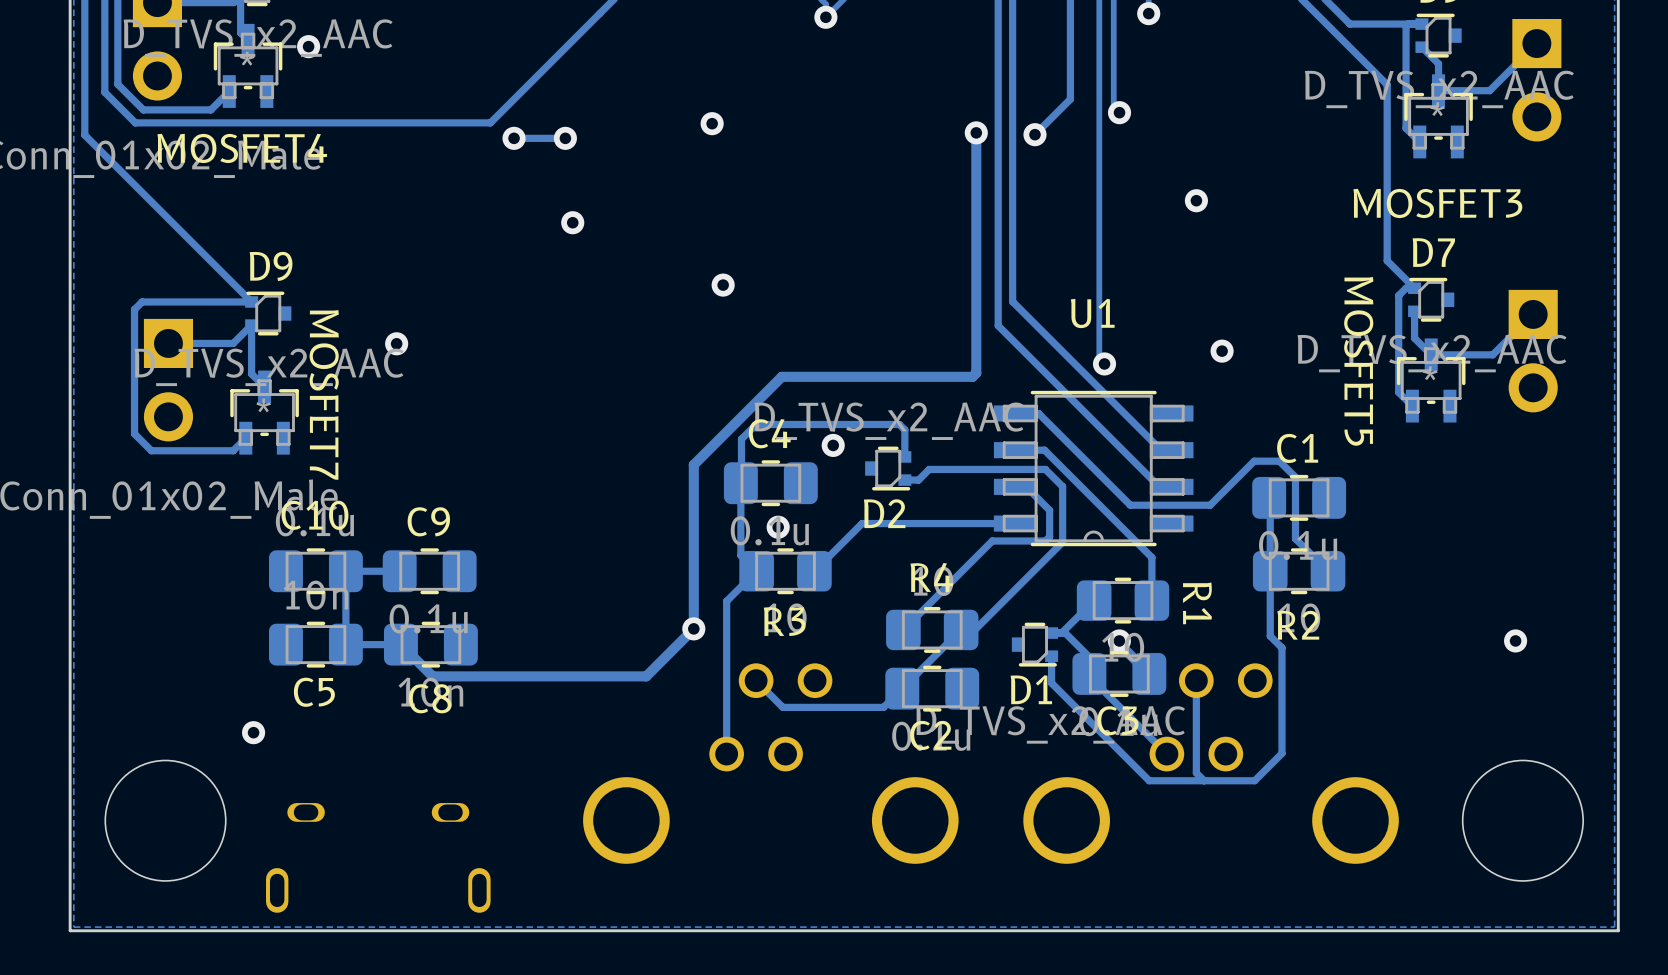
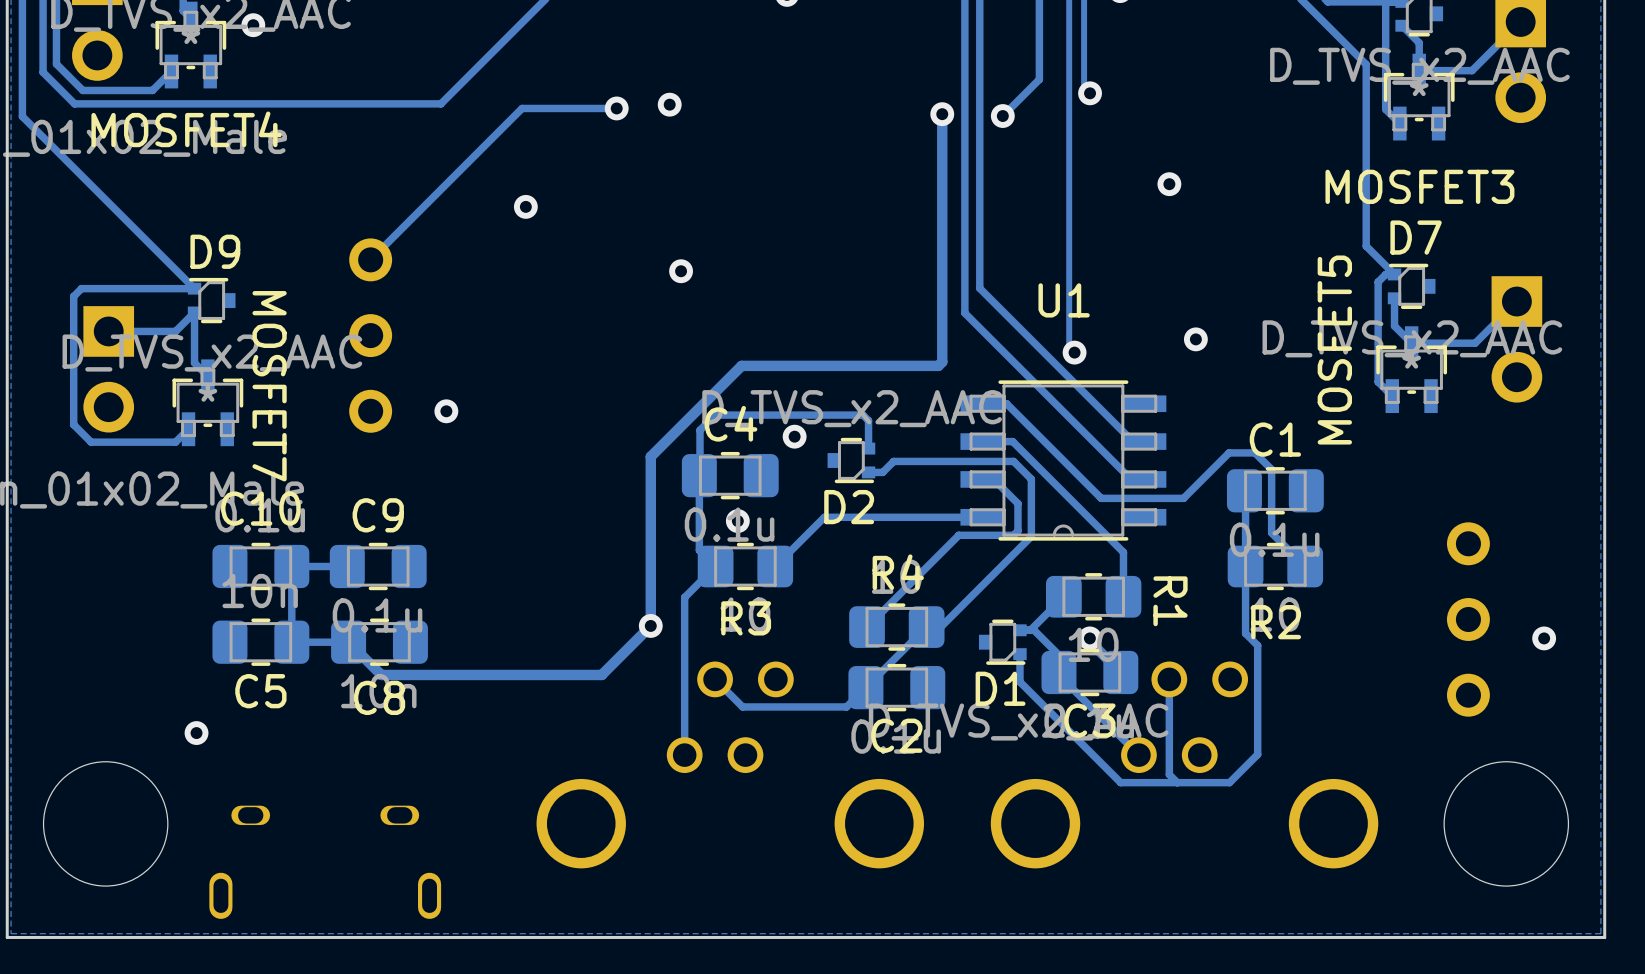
track: none -> (616, 108) (522, 108) (370, 259)
via: none -> (616, 108)
via: (514, 138) -> none
track: (565, 138) (514, 138) -> none
via: (565, 138) -> none
via position: (396, 343) -> (446, 411)
part: none -> (370, 335)
MOSFET5 name rotation: 0° (1358, 361) -> 180° (1334, 350)
part: none -> (1468, 619)
via position: (1515, 640) -> (1544, 638)

